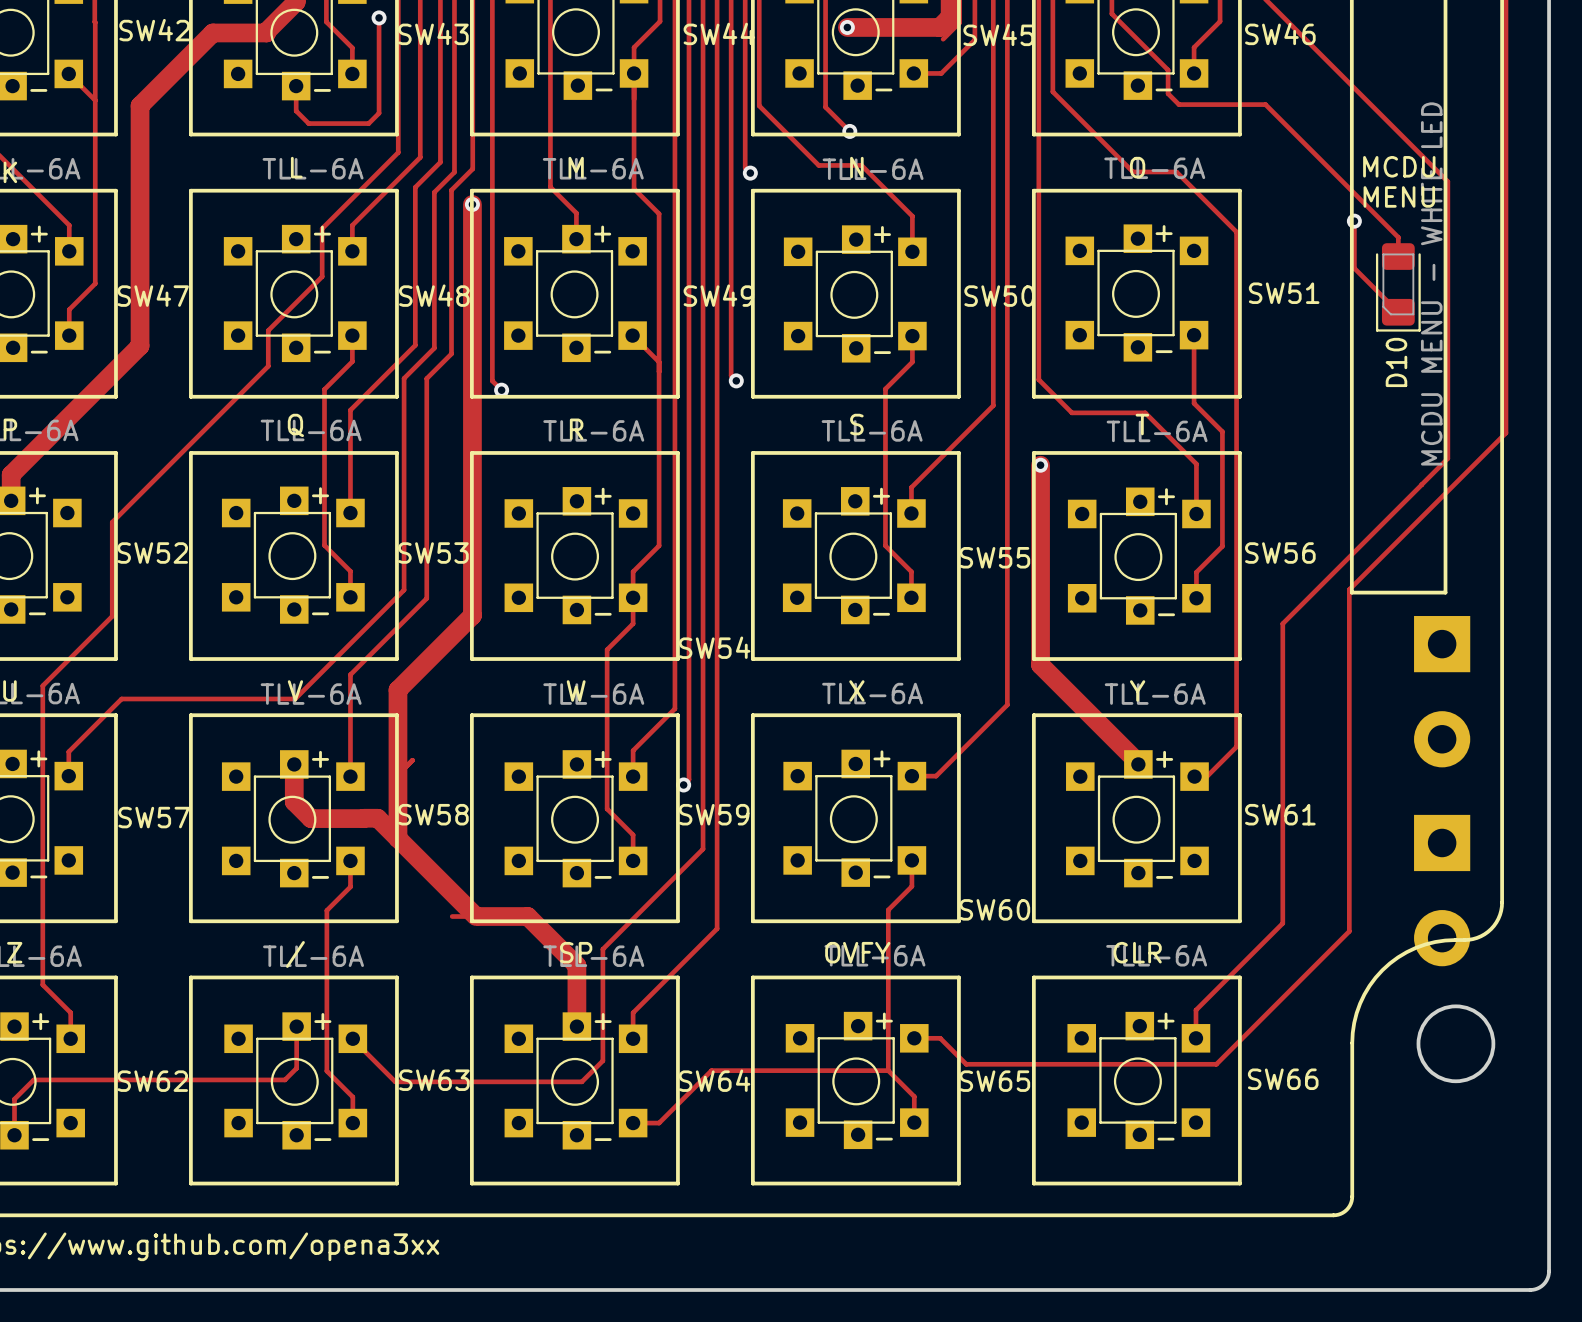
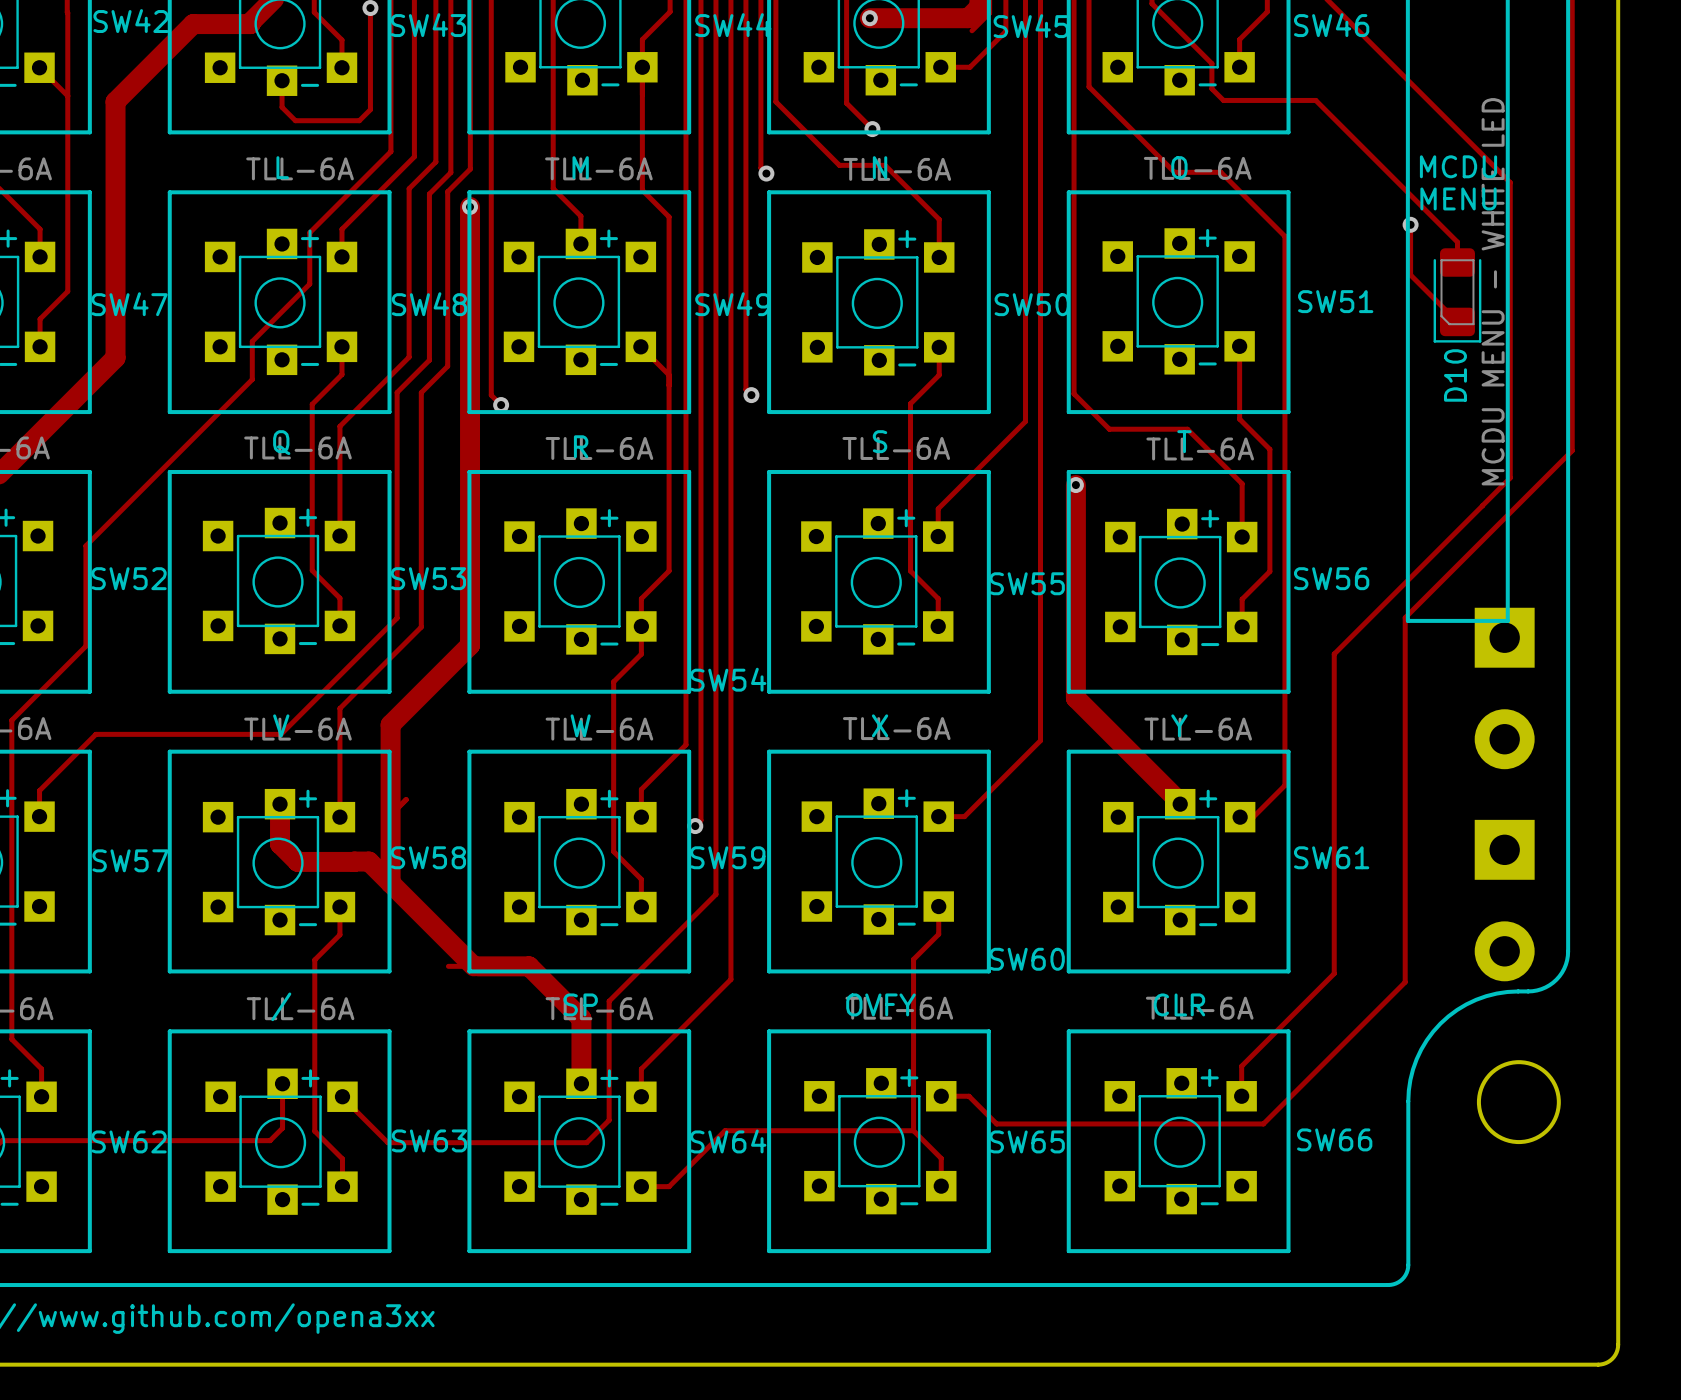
part position: (1442, 691) -> (1504, 688)
part position: (1442, 890) -> (1504, 900)

